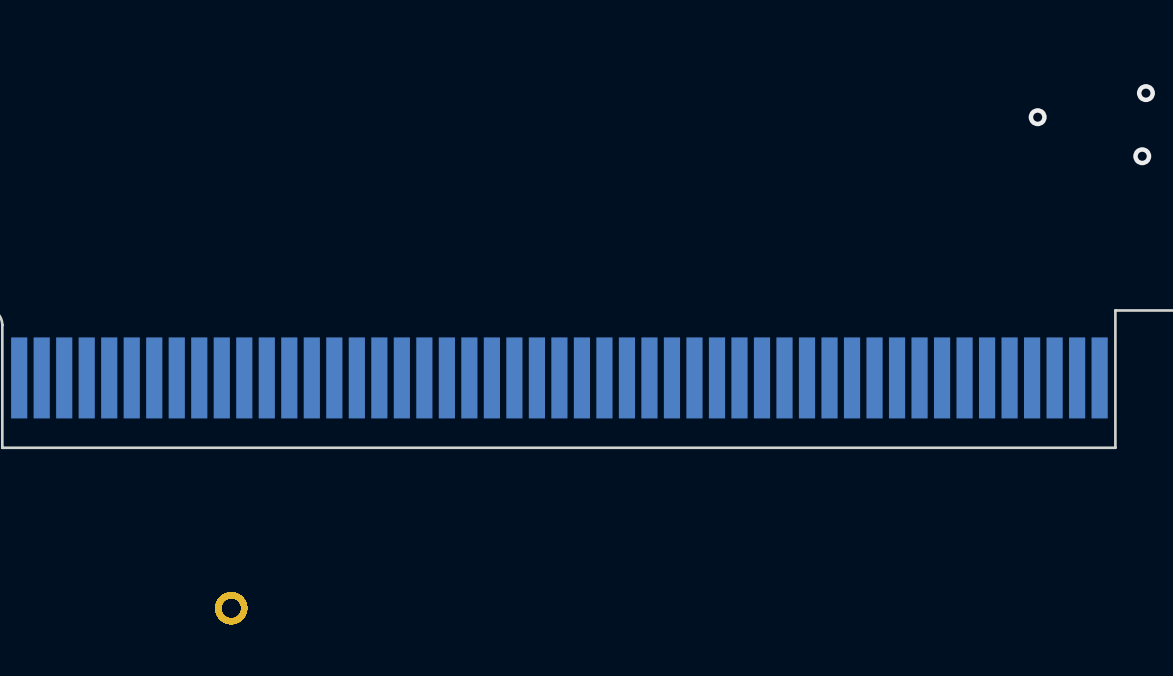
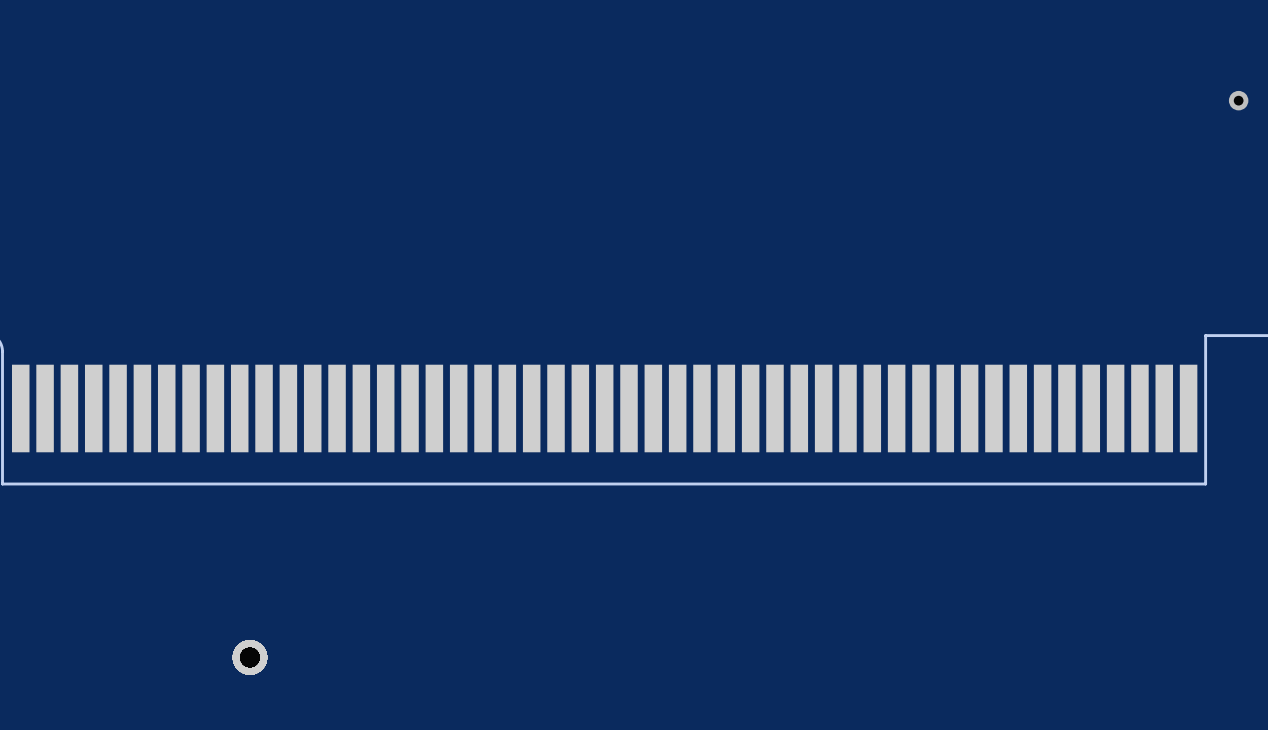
via: (1037, 117) -> none
via: (1142, 156) -> none

